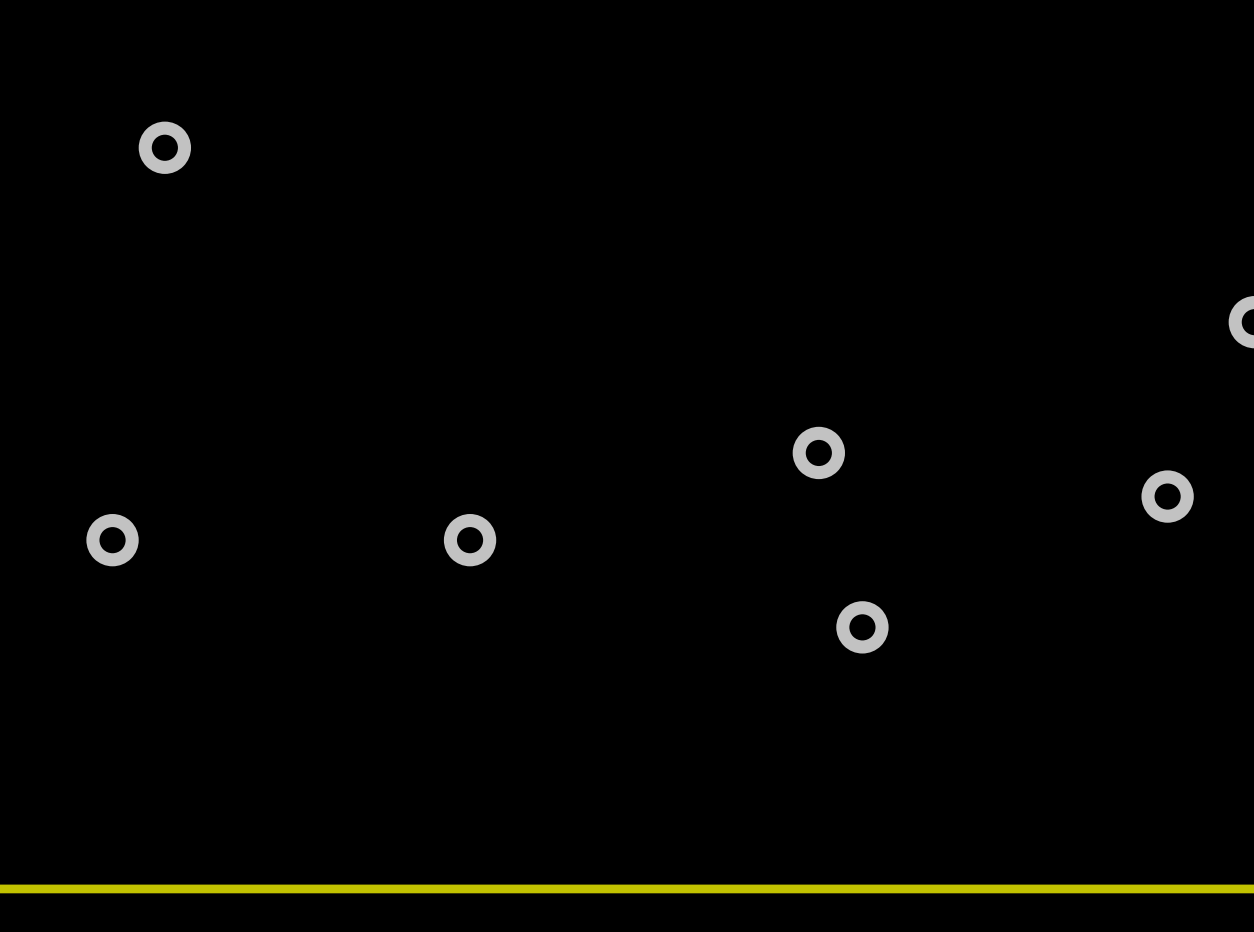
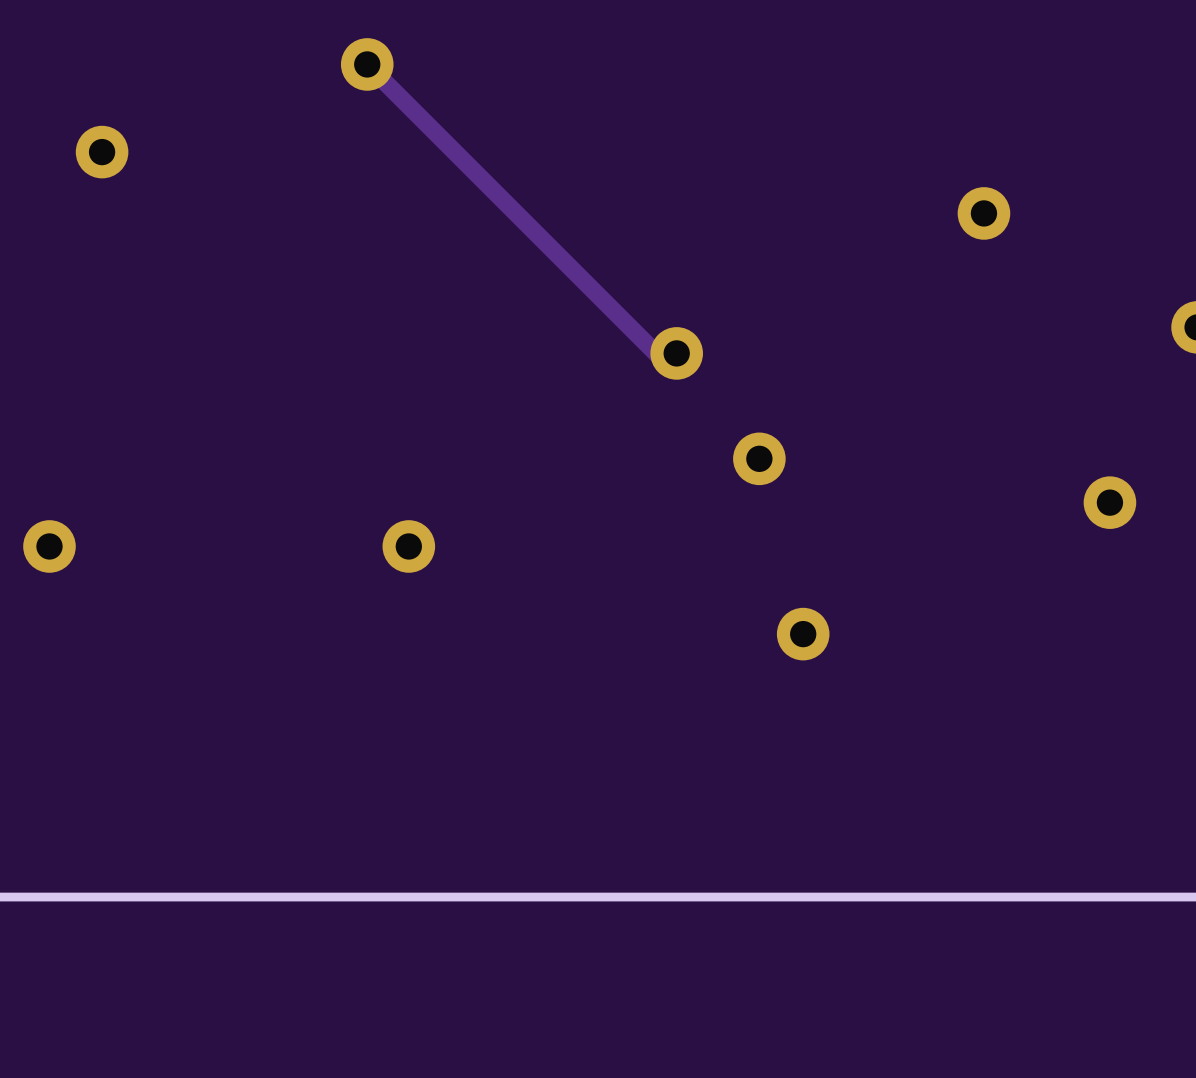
track: none -> (367, 64) (656, 353) (676, 353)
via: none -> (367, 64)
via: none -> (983, 213)
via: none -> (676, 353)

